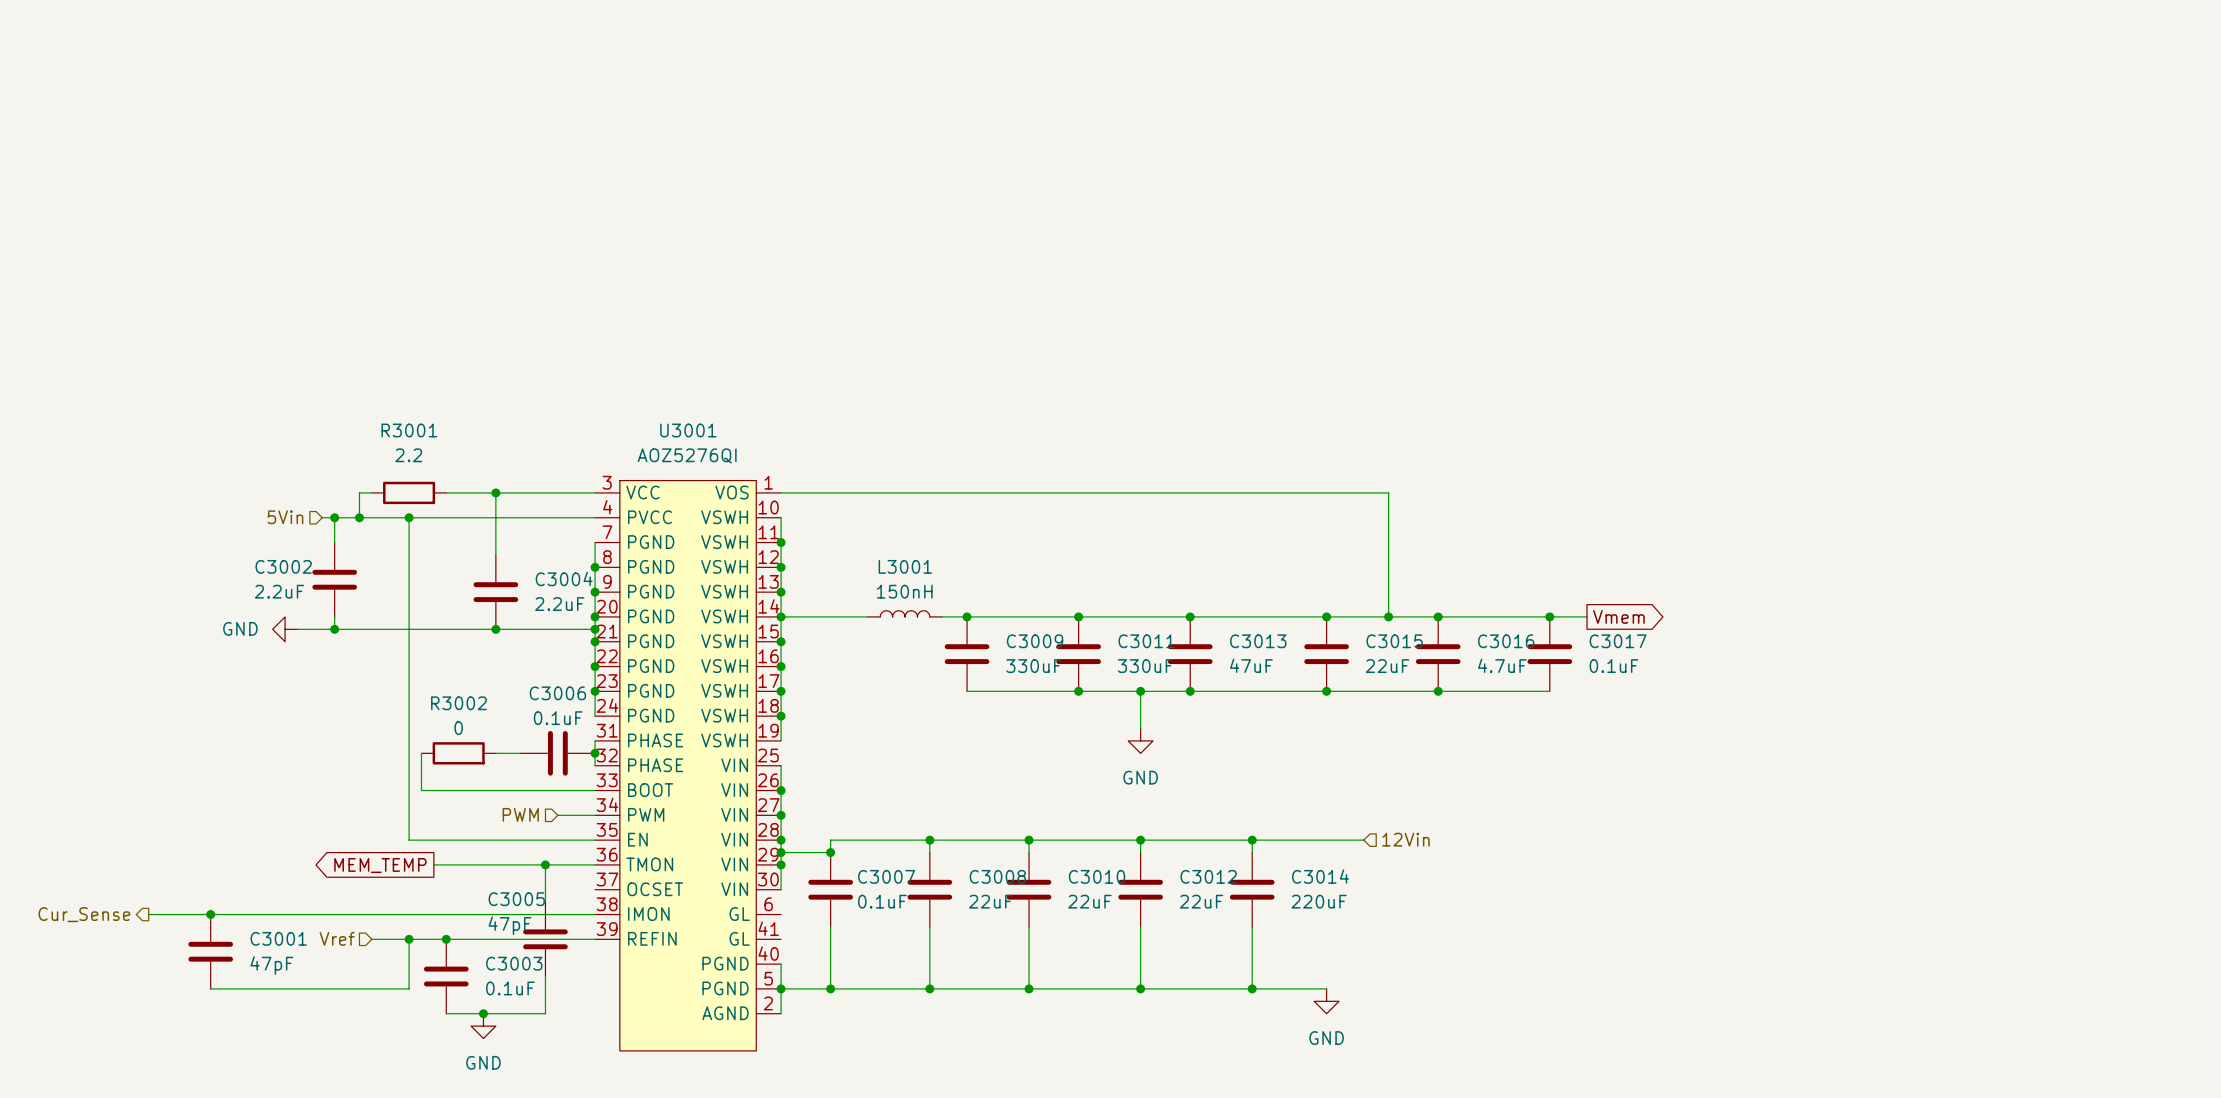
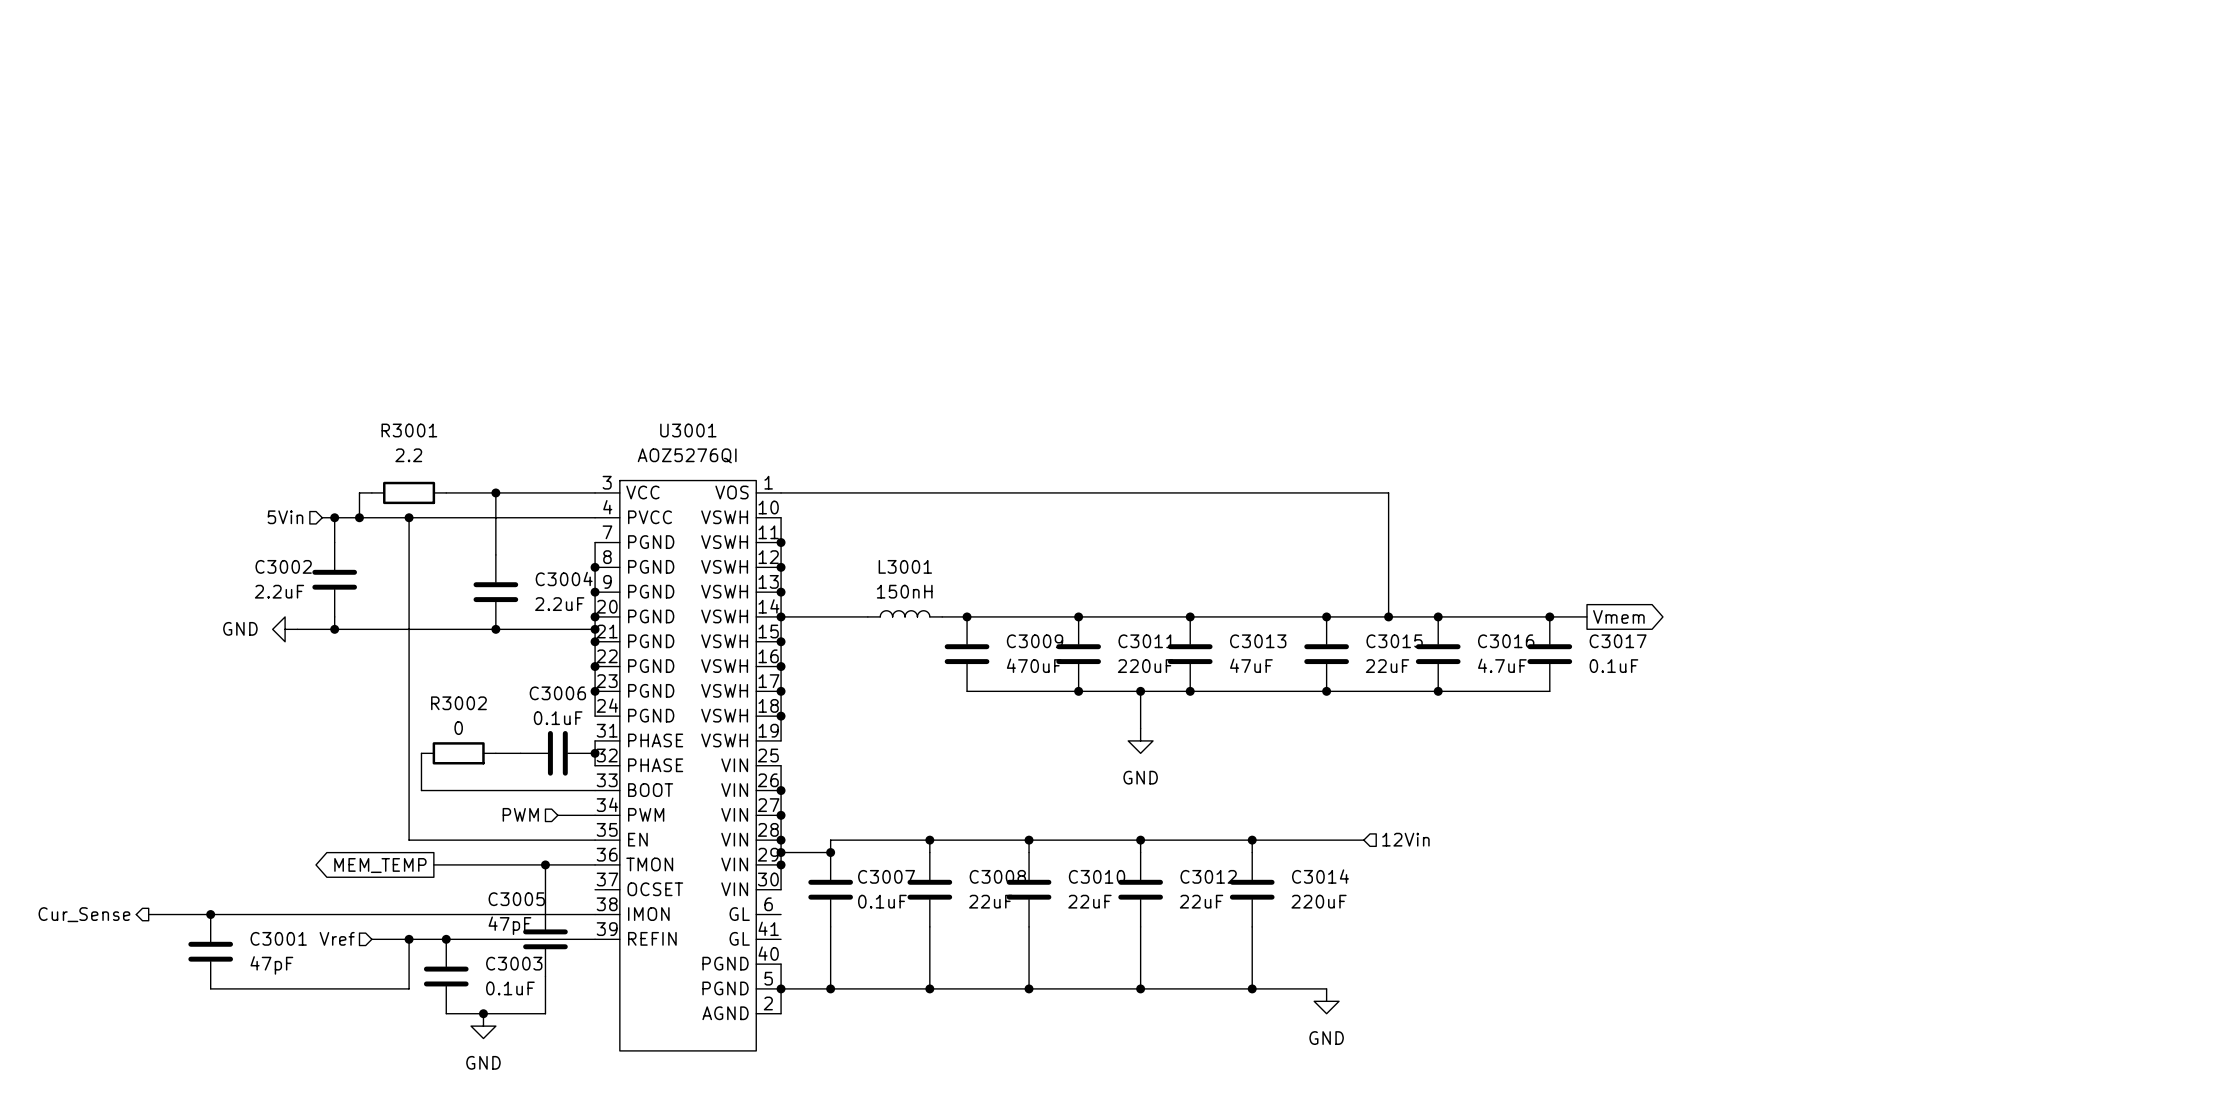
C3009 value: 330uF (1033, 666) -> 470uF (1034, 665)
C3011 value: 330uF (1145, 666) -> 220uF (1145, 666)

